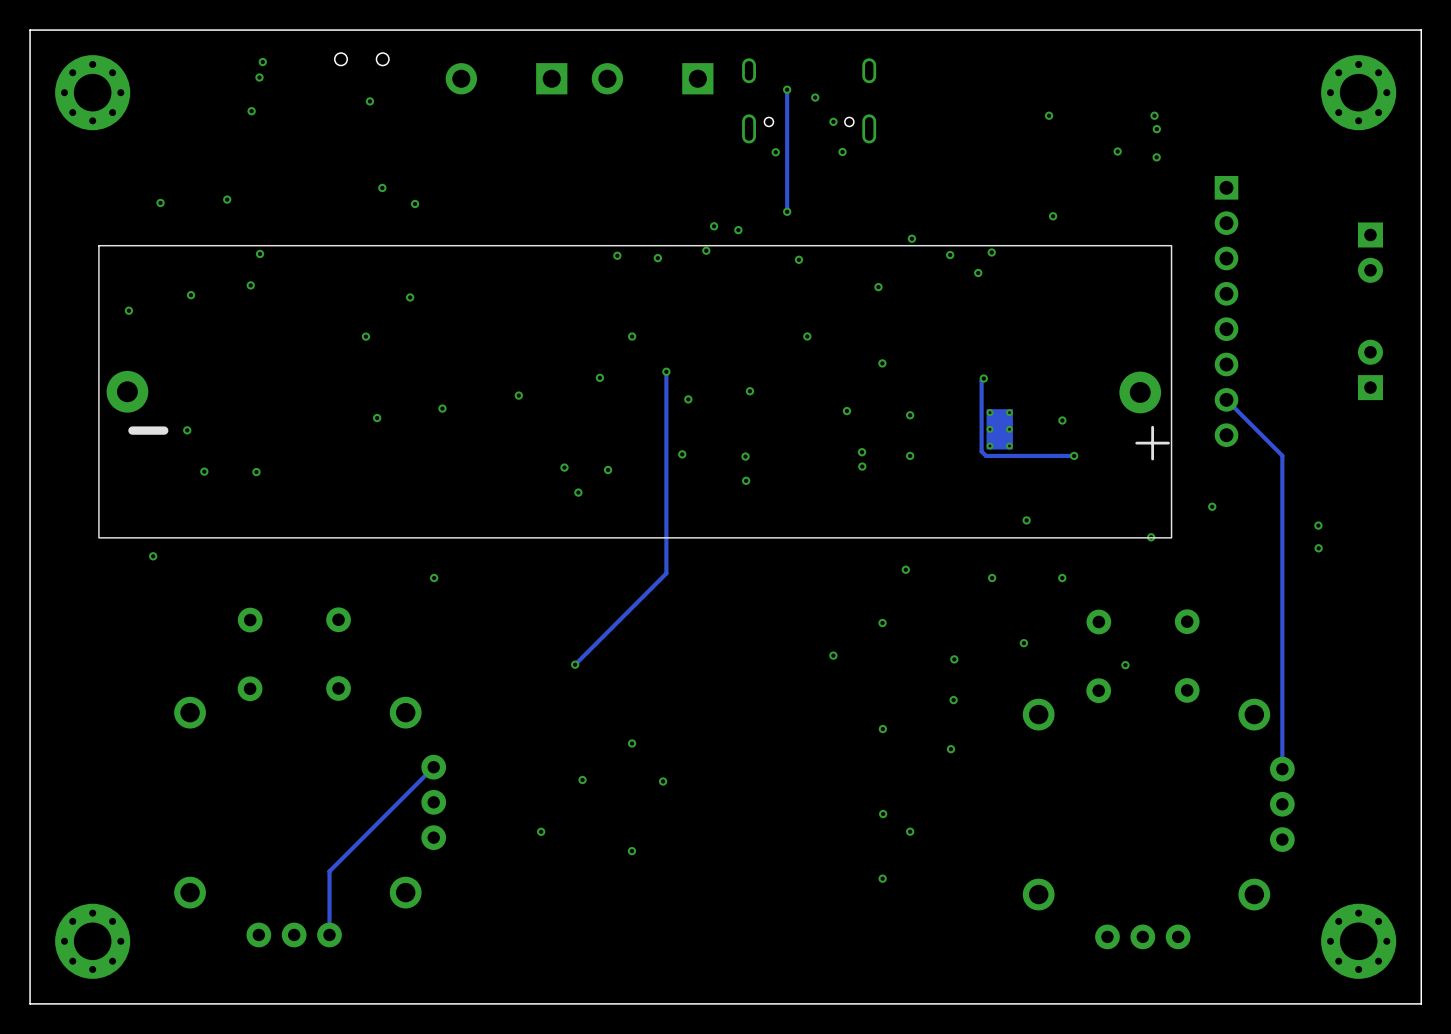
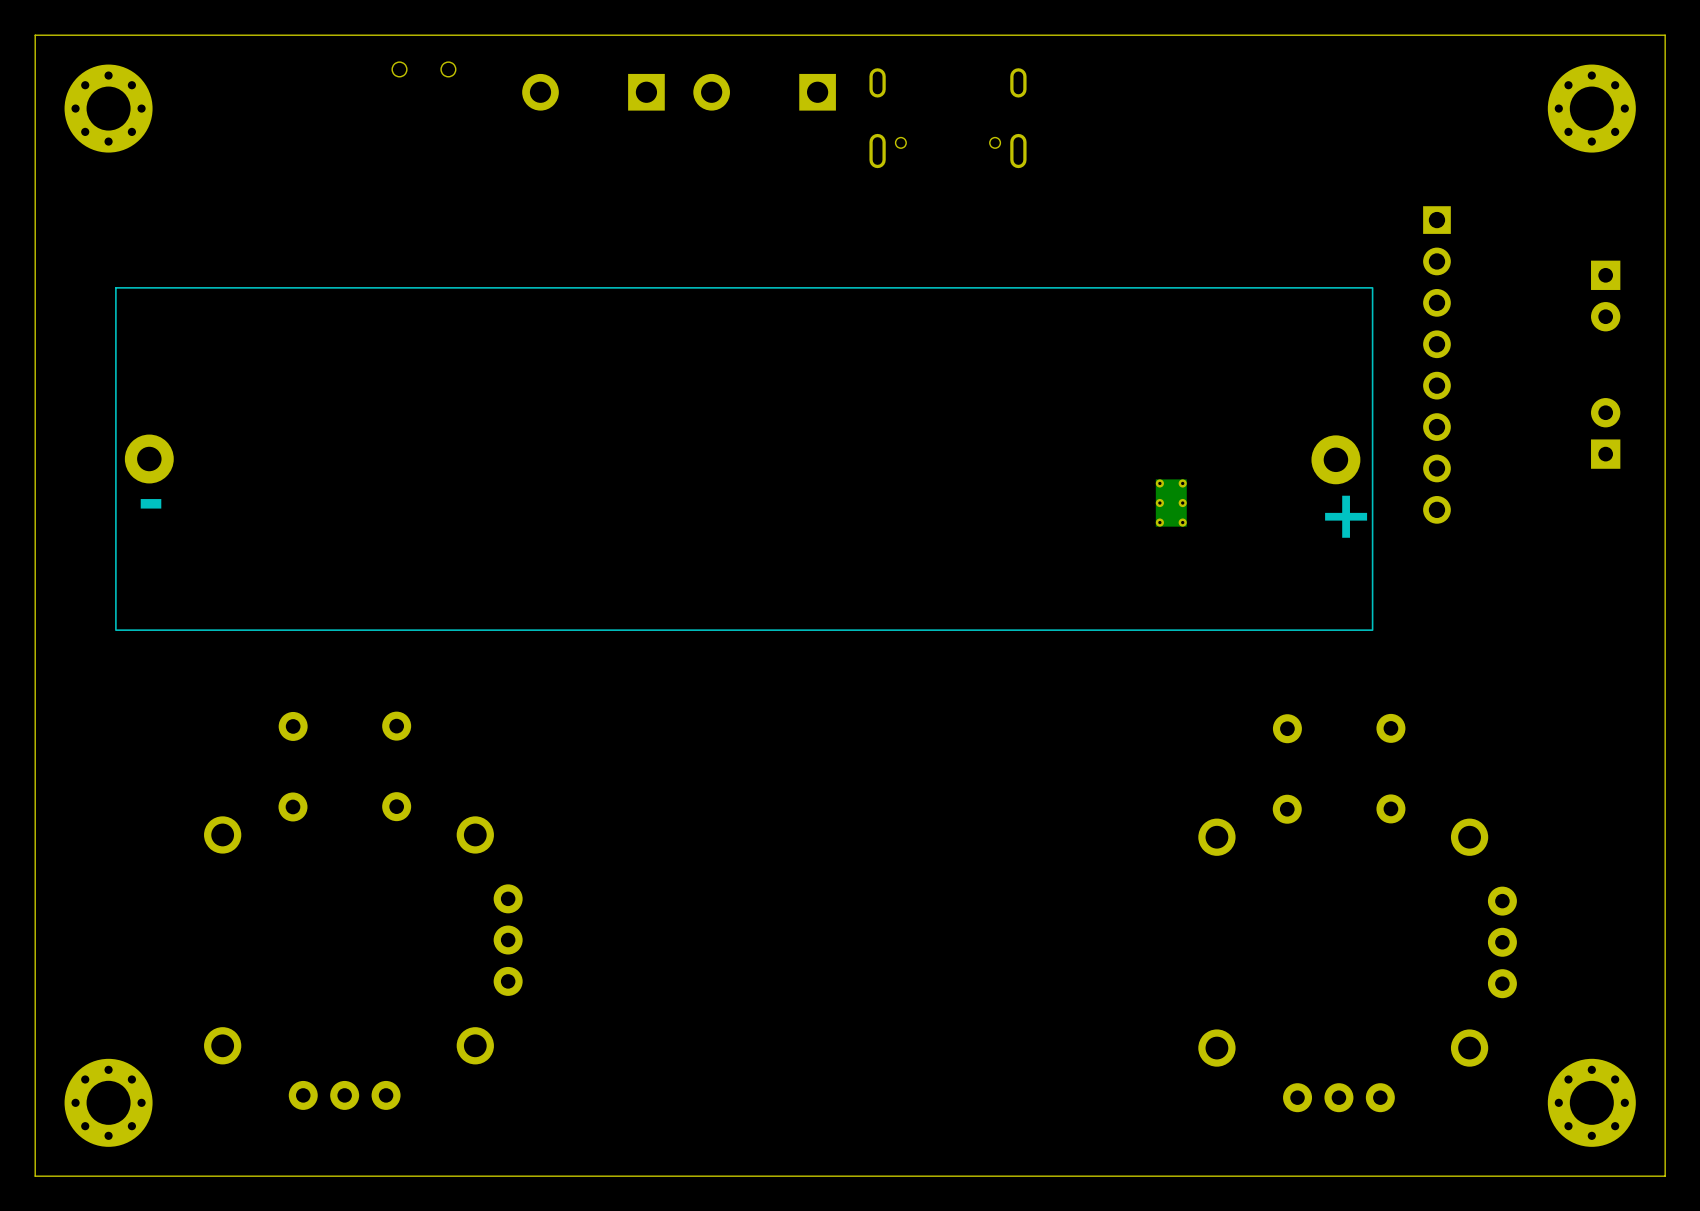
via: (262, 62) -> none
via: (259, 77) -> none
track: (787, 89) (787, 211) -> none
via: (787, 89) -> none
via: (815, 97) -> none
via: (369, 101) -> none
via: (251, 111) -> none
via: (1049, 115) -> none
via: (1154, 115) -> none
via: (833, 121) -> none
via: (1156, 129) -> none
via: (1117, 151) -> none
via: (775, 152) -> none
via: (842, 152) -> none
via: (1156, 157) -> none
via: (382, 187) -> none
via: (227, 199) -> none
via: (160, 202) -> none
via: (415, 204) -> none
via: (787, 211) -> none
via: (1053, 216) -> none
via: (714, 226) -> none
via: (738, 230) -> none
via: (911, 238) -> none
via: (706, 250) -> none
via: (991, 252) -> none
via: (260, 253) -> none
via: (617, 255) -> none
via: (950, 255) -> none
via: (657, 258) -> none
via: (798, 259) -> none
via: (978, 273) -> none
via: (250, 285) -> none
via: (878, 287) -> none
via: (191, 295) -> none
via: (410, 297) -> none
via: (128, 310) -> none
via: (365, 336) -> none
via: (632, 336) -> none
via: (807, 336) -> none
via: (882, 363) -> none
track: (666, 371) (666, 573) (575, 664) -> none
via: (666, 371) -> none
via: (599, 377) -> none
track: (983, 378) (981, 380) (981, 451) (986, 455) (1074, 455) -> none
via: (983, 378) -> none
via: (749, 391) -> none
via: (518, 395) -> none
via: (688, 399) -> none
track: (1226, 399) (1282, 455) (1282, 769) -> none
via: (442, 408) -> none
via: (846, 411) -> none
via: (910, 415) -> none
via: (377, 418) -> none
via: (1062, 420) -> none
via: (187, 430) -> none
via: (862, 452) -> none
via: (682, 454) -> none
via: (910, 455) -> none
via: (1074, 455) -> none
via: (745, 456) -> none
via: (862, 466) -> none
via: (564, 467) -> none
via: (608, 470) -> none
via: (204, 471) -> none
via: (256, 472) -> none
via: (746, 480) -> none
via: (578, 492) -> none
via: (1212, 506) -> none
via: (1026, 520) -> none
via: (1318, 525) -> none
via: (1151, 537) -> none
via: (1318, 548) -> none
via: (153, 556) -> none
via: (905, 569) -> none
via: (434, 578) -> none
via: (992, 578) -> none
via: (1062, 578) -> none
via: (882, 623) -> none
via: (1023, 643) -> none
via: (833, 655) -> none
via: (954, 659) -> none
via: (575, 664) -> none
via: (1125, 665) -> none
via: (953, 700) -> none
via: (882, 729) -> none
via: (632, 743) -> none
via: (950, 749) -> none
track: (433, 767) (329, 871) (329, 934) -> none
via: (582, 779) -> none
via: (663, 781) -> none
via: (883, 814) -> none
via: (541, 831) -> none
via: (910, 831) -> none
via: (631, 851) -> none
via: (882, 878) -> none

